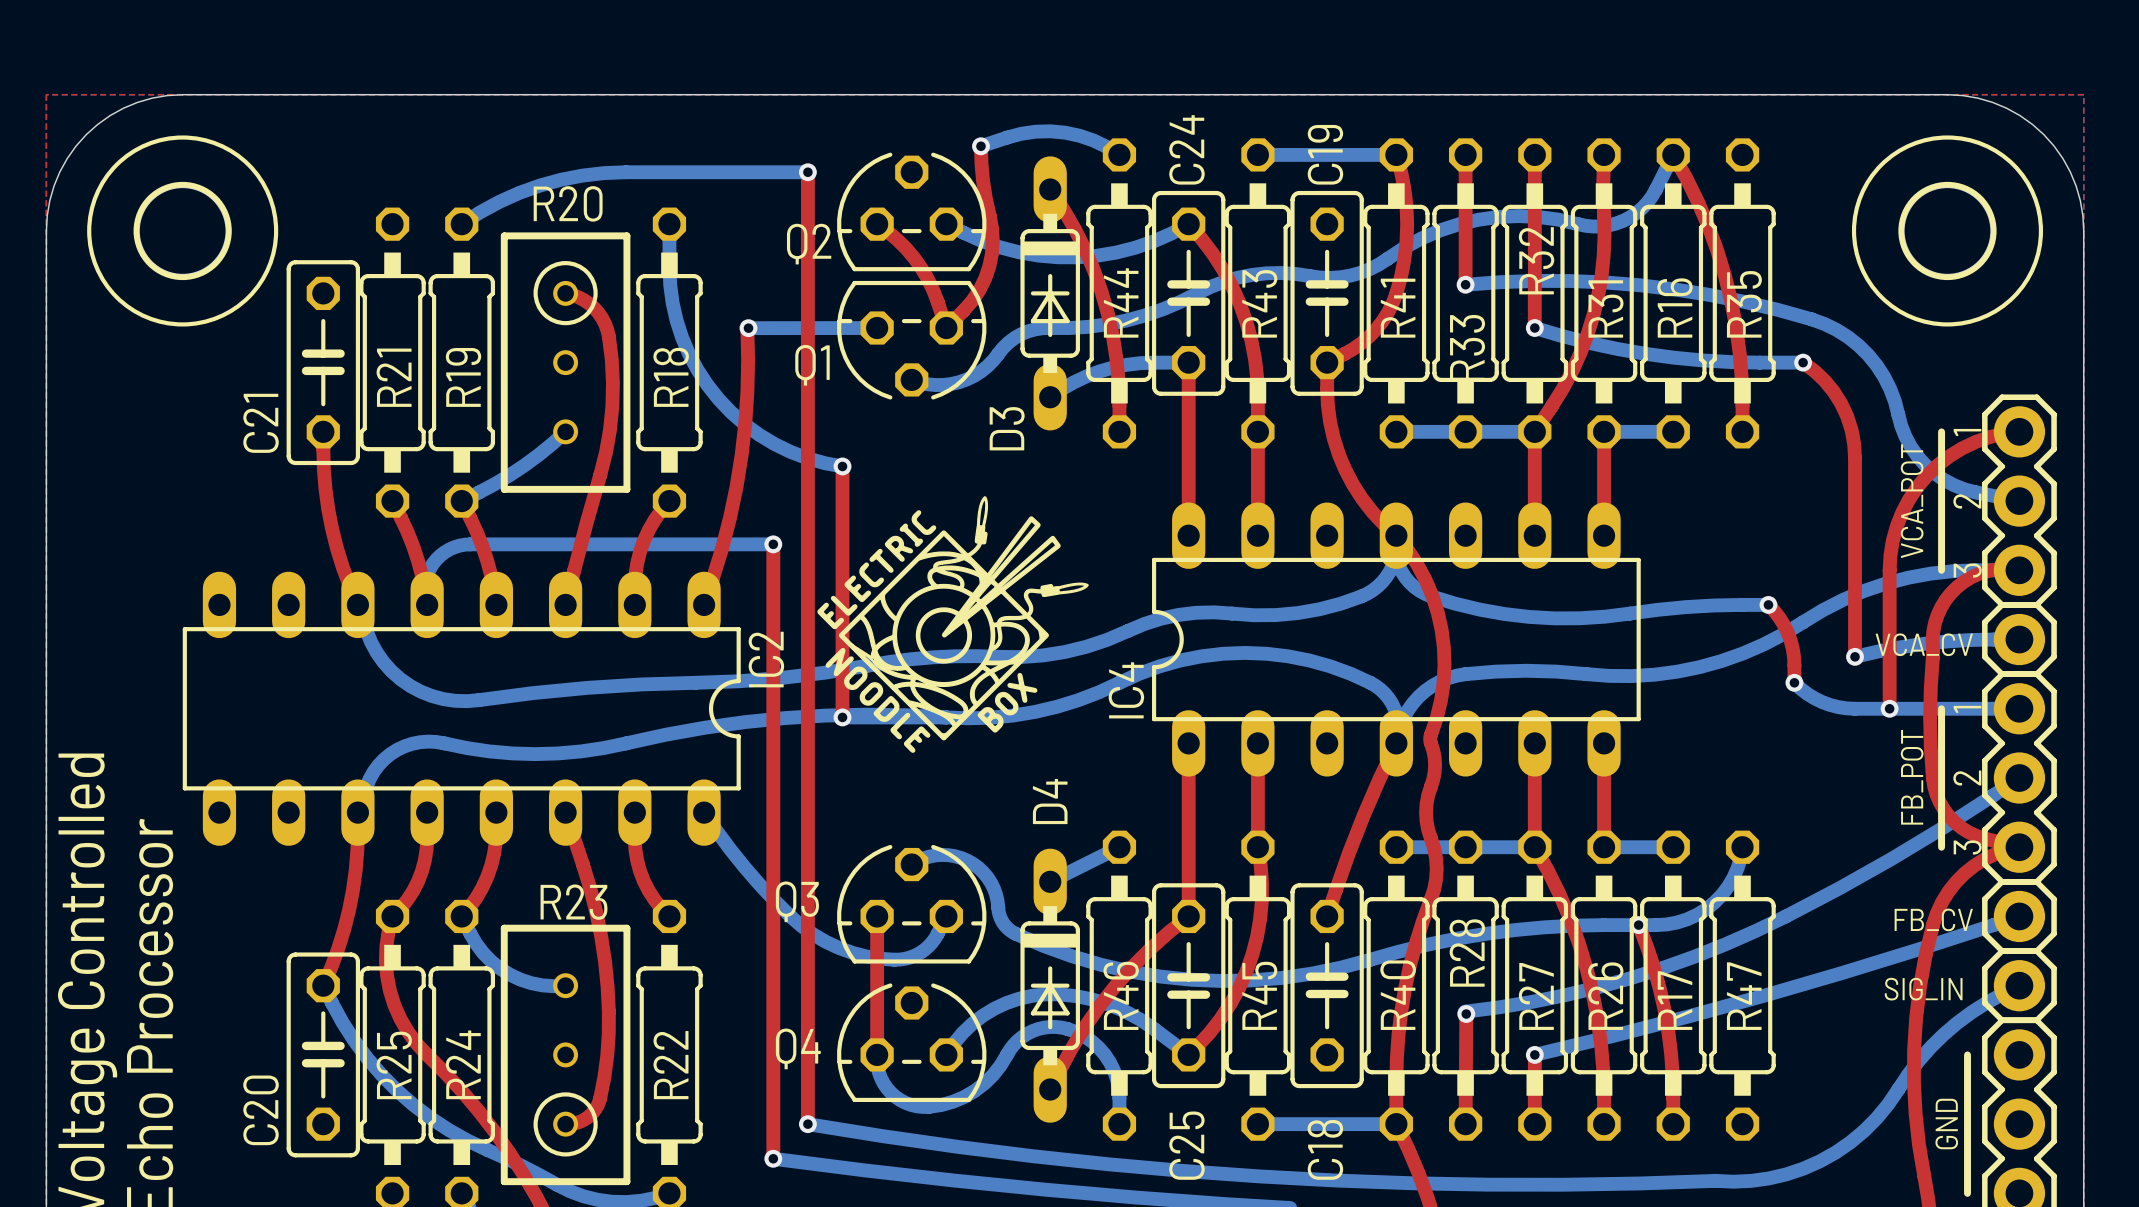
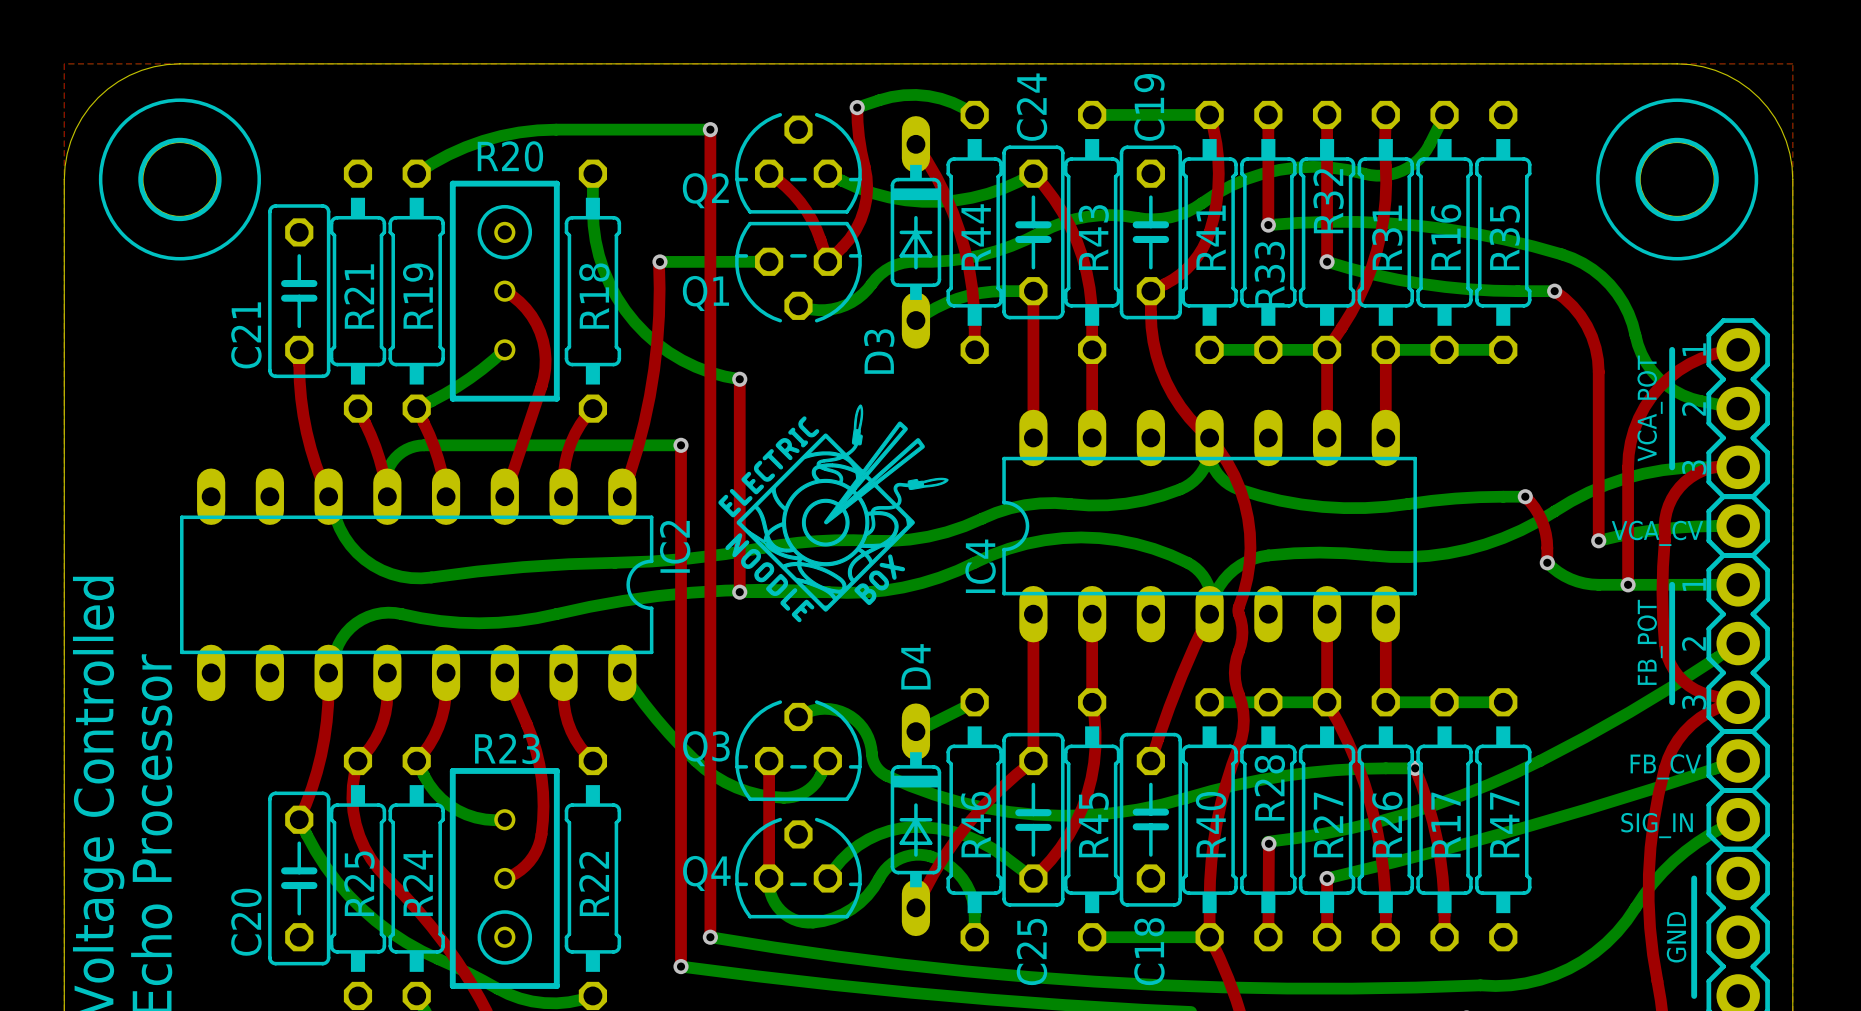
top track: (1673, 154) (1708, 225) (1724, 275) (1739, 353) (1742, 431) -> none
top track: (565, 293) (583, 300) (594, 308) (602, 318) (608, 336) (612, 383) (610, 429) (605, 452) (565, 604) -> (504, 291) (519, 302) (531, 315) (540, 332) (545, 359) (541, 386) (504, 496)
bottom track: none -> (1444, 349) (1503, 349)
top track: (565, 812) (596, 912) (605, 961) (608, 1011) (607, 1055) (599, 1101) (593, 1112) (584, 1119) (565, 1124) -> (504, 672) (536, 750) (541, 778) (543, 806) (541, 834) (536, 851) (520, 870) (504, 878)
bottom track: (1742, 847) (1737, 867) (1728, 886) (1705, 909) (1677, 922) (1638, 925) -> (1503, 702) (1444, 702)

